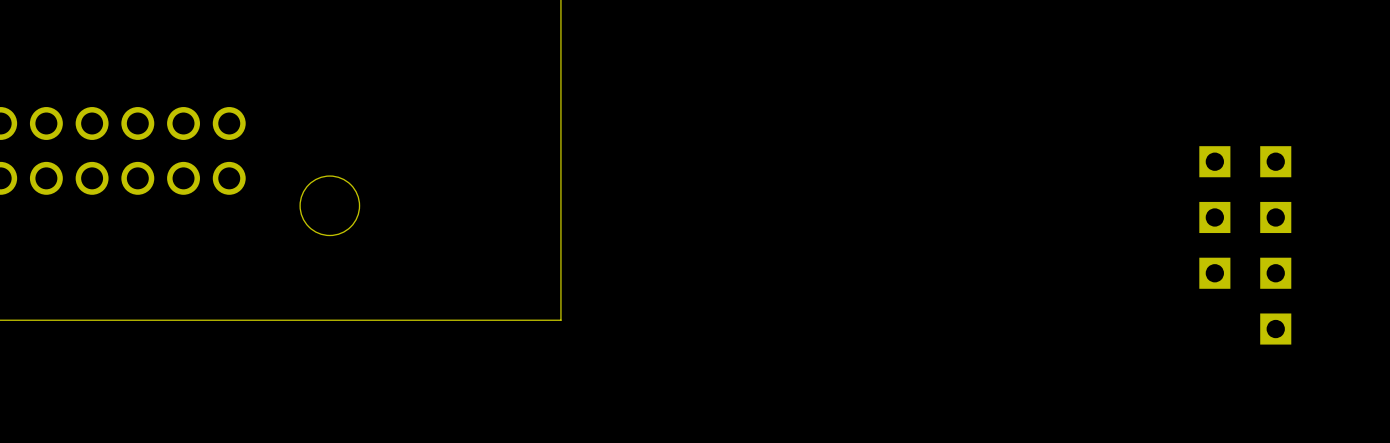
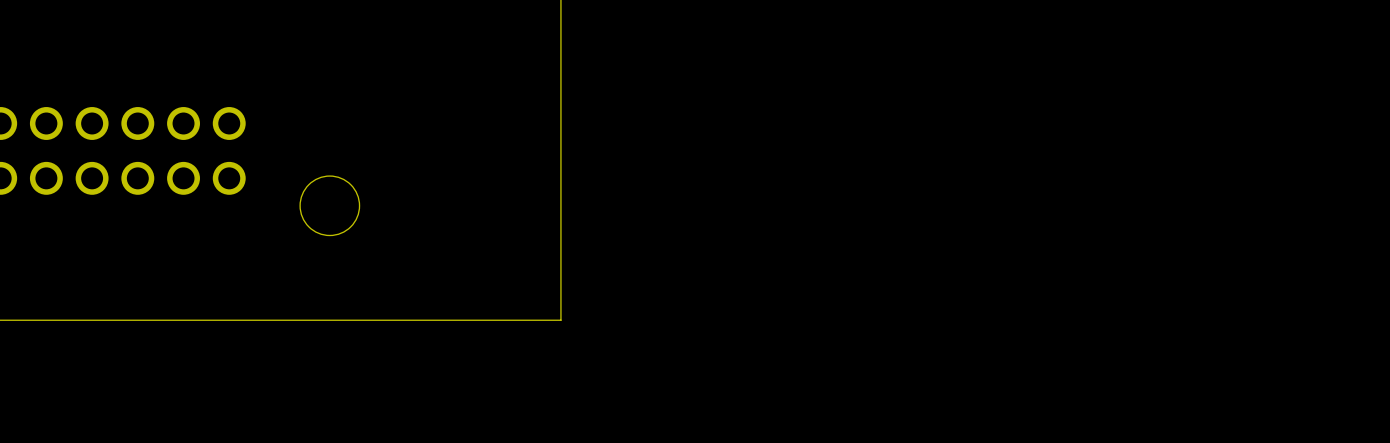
part: (1214, 161) -> none
part: (1275, 161) -> none
part: (1214, 217) -> none
part: (1275, 217) -> none
part: (1214, 273) -> none
part: (1275, 273) -> none
part: (1275, 329) -> none

